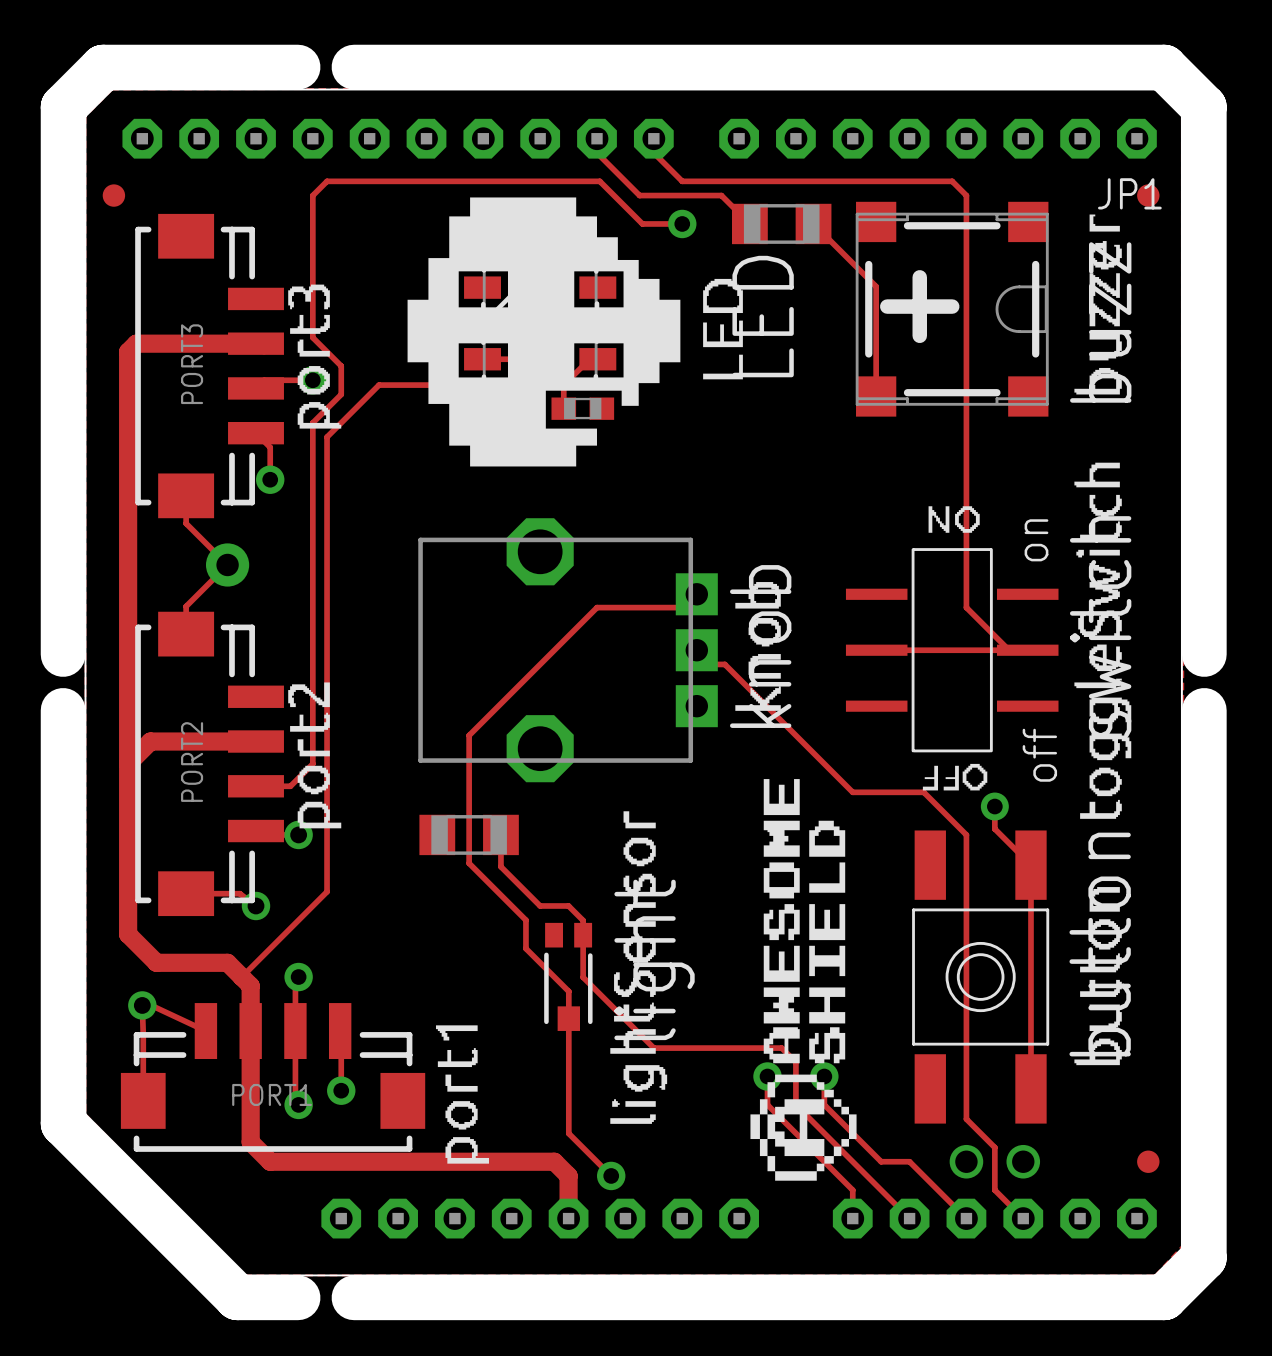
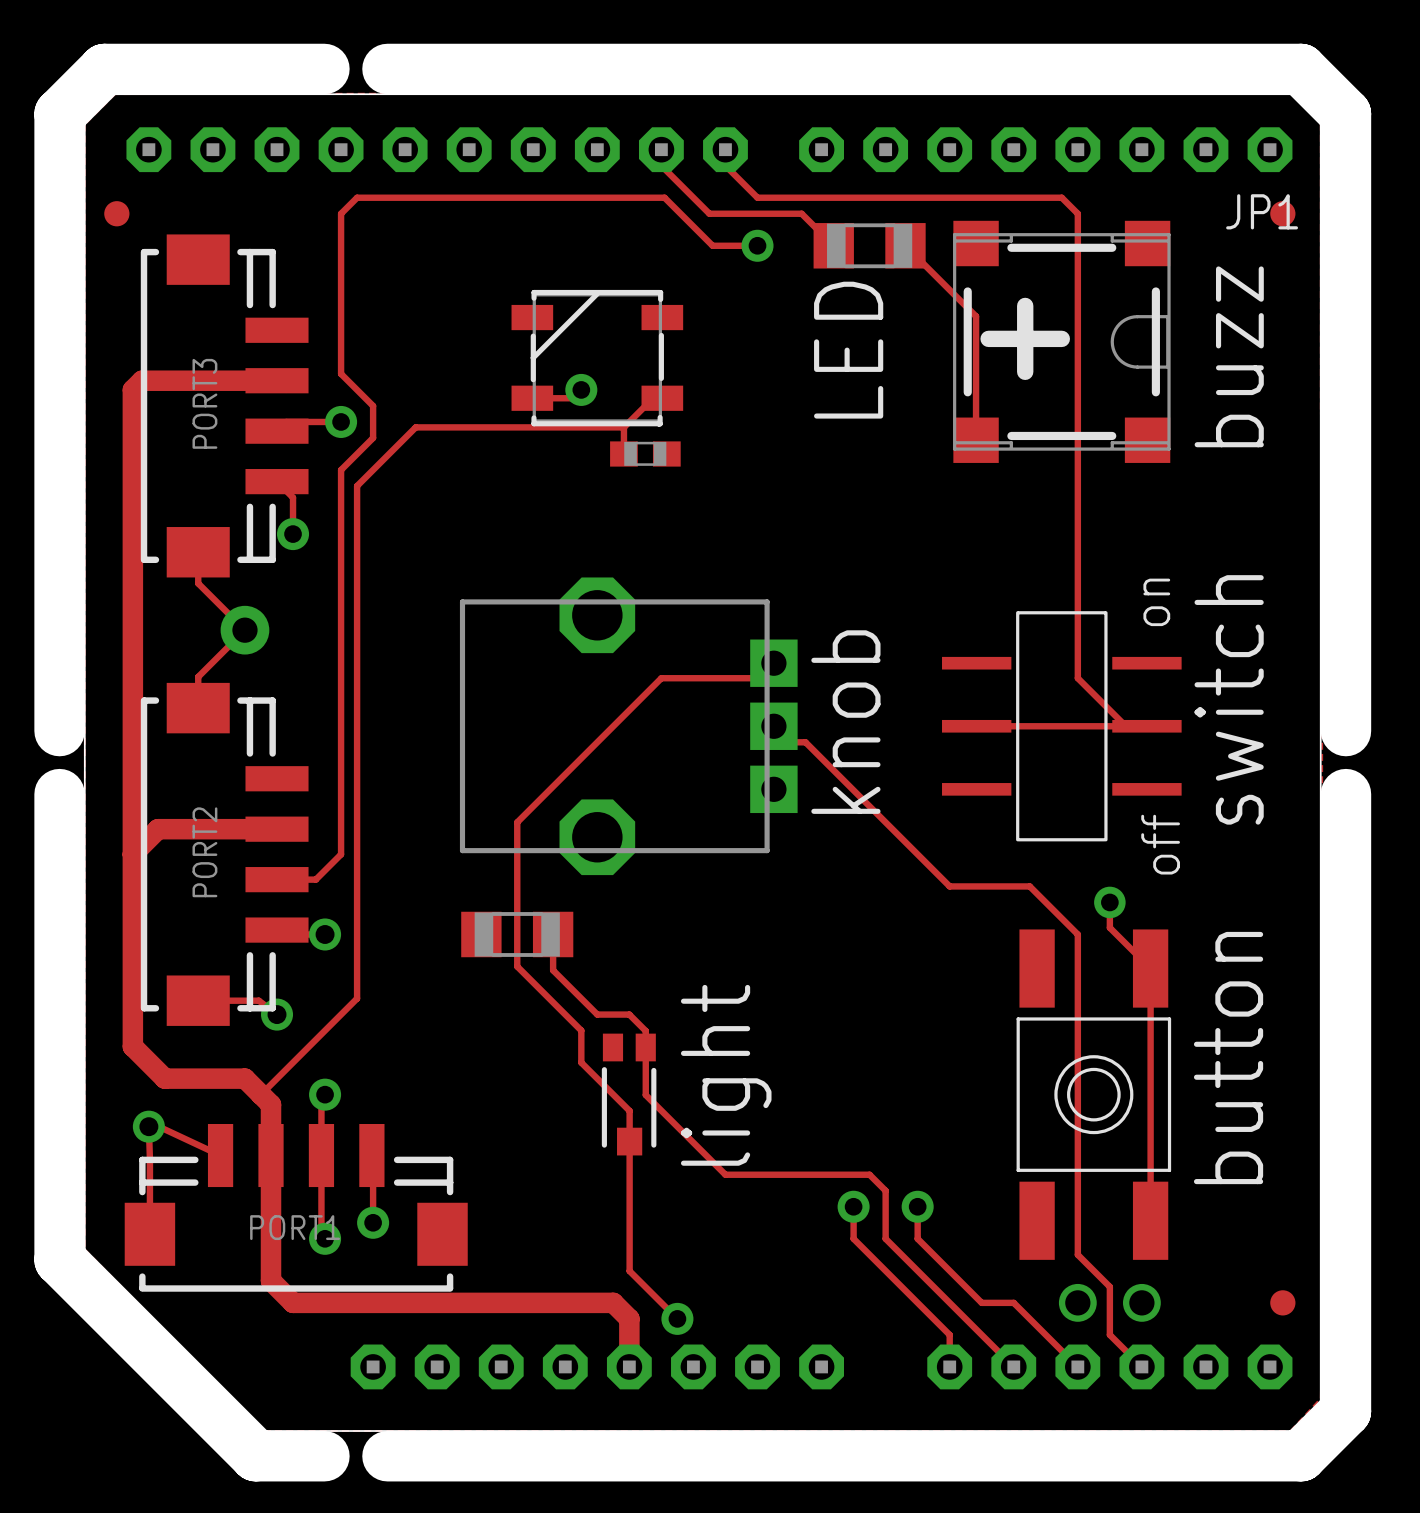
drawing: [407, 197, 743, 467] -> none
drawing: [1074, 214, 1122, 395] -> none
drawing: [288, 284, 342, 429] -> none
drawing: [1074, 462, 1132, 819] -> none
drawing: [928, 506, 980, 533] -> none
drawing: [735, 582, 781, 711] -> none
drawing: [288, 682, 342, 829] -> none
drawing: [922, 763, 988, 791] -> none
drawing: [750, 779, 857, 1181] -> none
drawing: [610, 811, 668, 1124] -> none
drawing: [1074, 887, 1122, 1066] -> none
drawing: [435, 1025, 490, 1164] -> none

